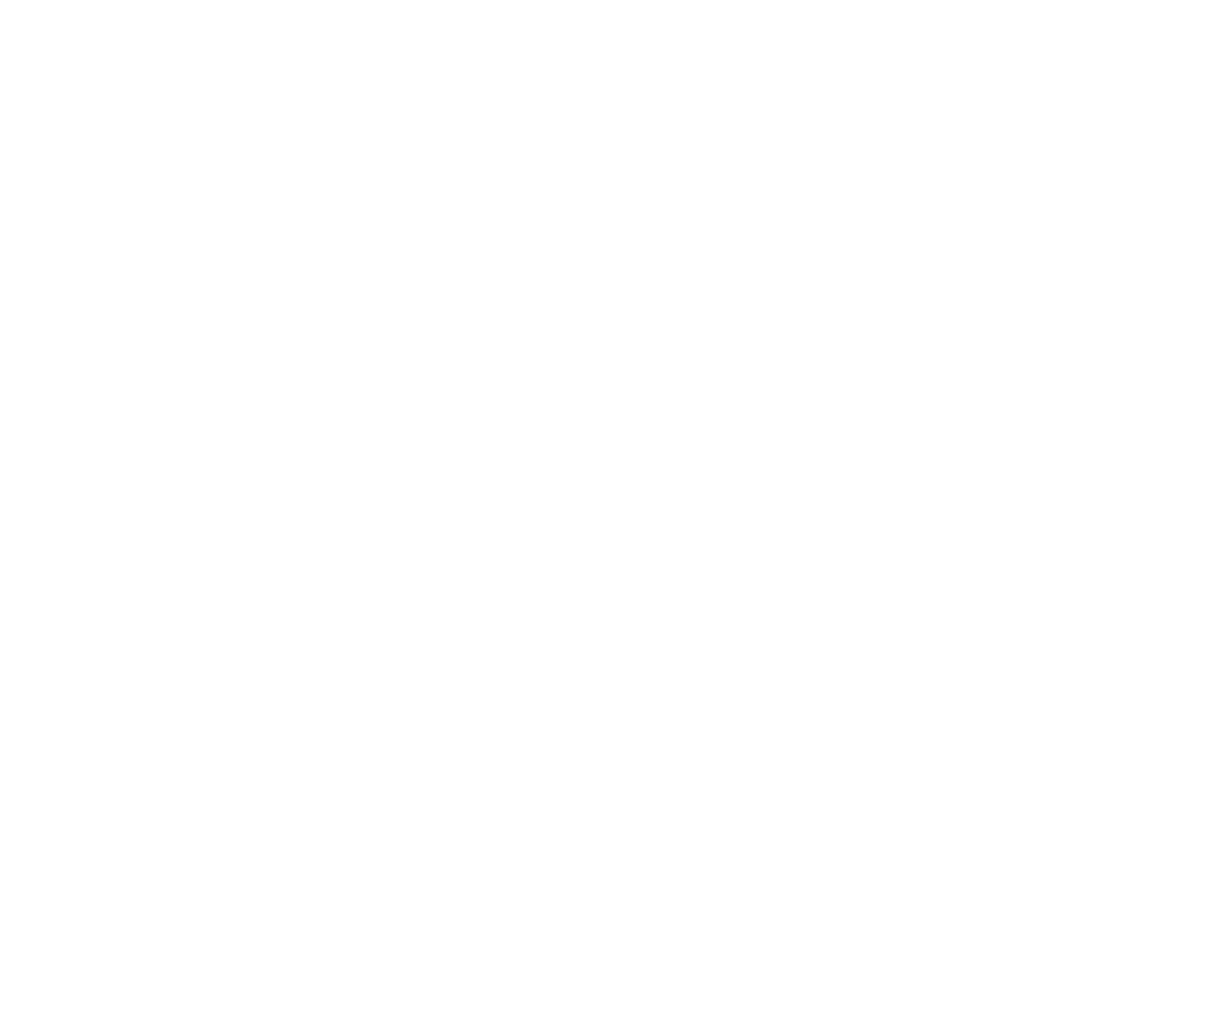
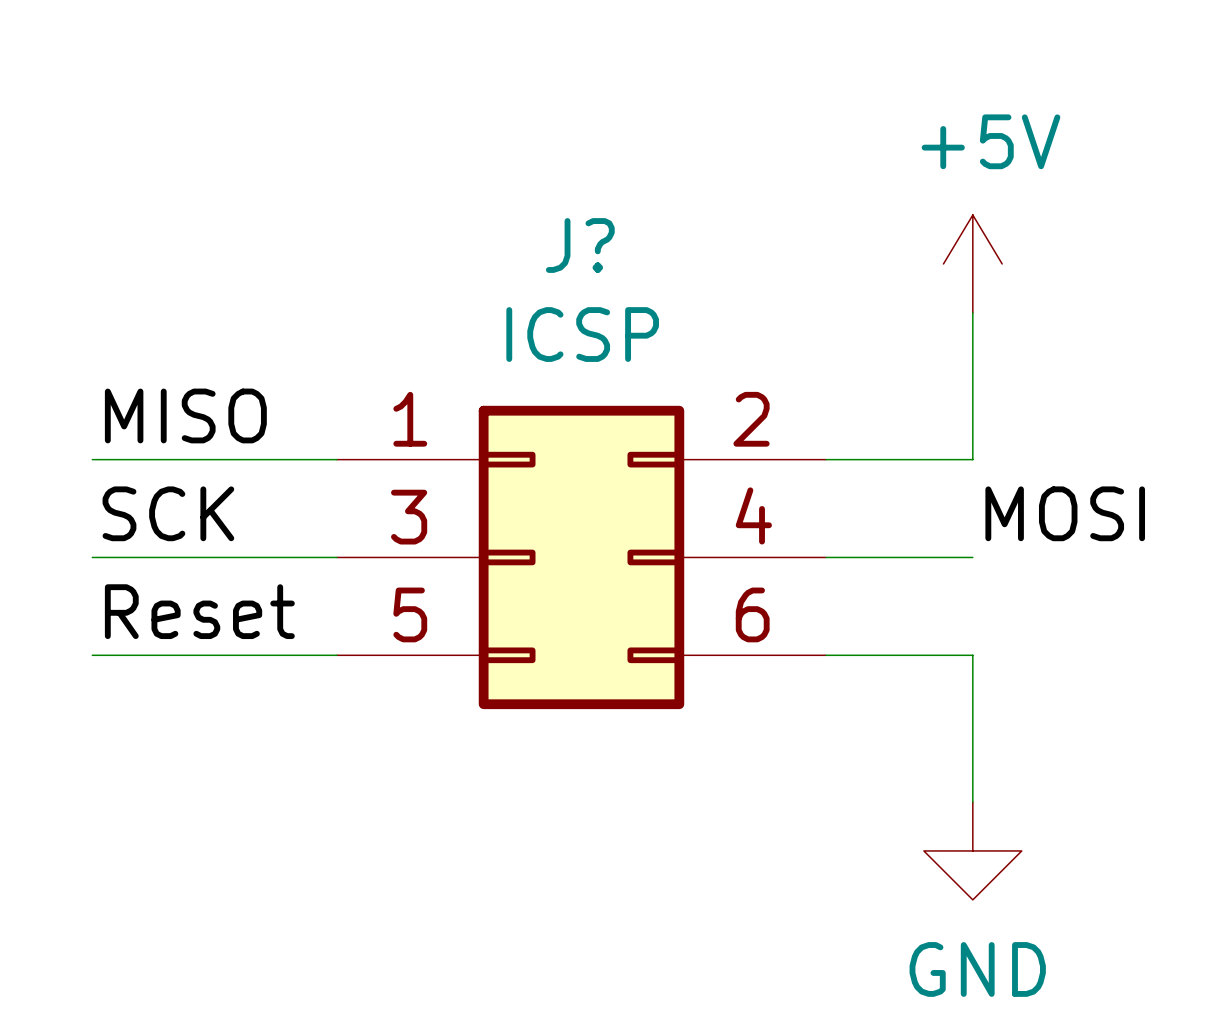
power symbol: none -> +5V (972, 263)
wire: none -> (972, 312) (972, 459) (826, 459)
label: none -> MISO (185, 415)
wire: none -> (92, 459) (336, 459)
label: none -> SCK (168, 513)
label: none -> MOSI (1065, 513)
wire: none -> (92, 557) (336, 557)
J?: none -> ICSP (581, 557)
wire: none -> (826, 557) (972, 557)
label: none -> Reset (199, 611)
wire: none -> (92, 655) (336, 655)
wire: none -> (826, 655) (972, 655) (972, 802)
power symbol: none -> GND (972, 850)

